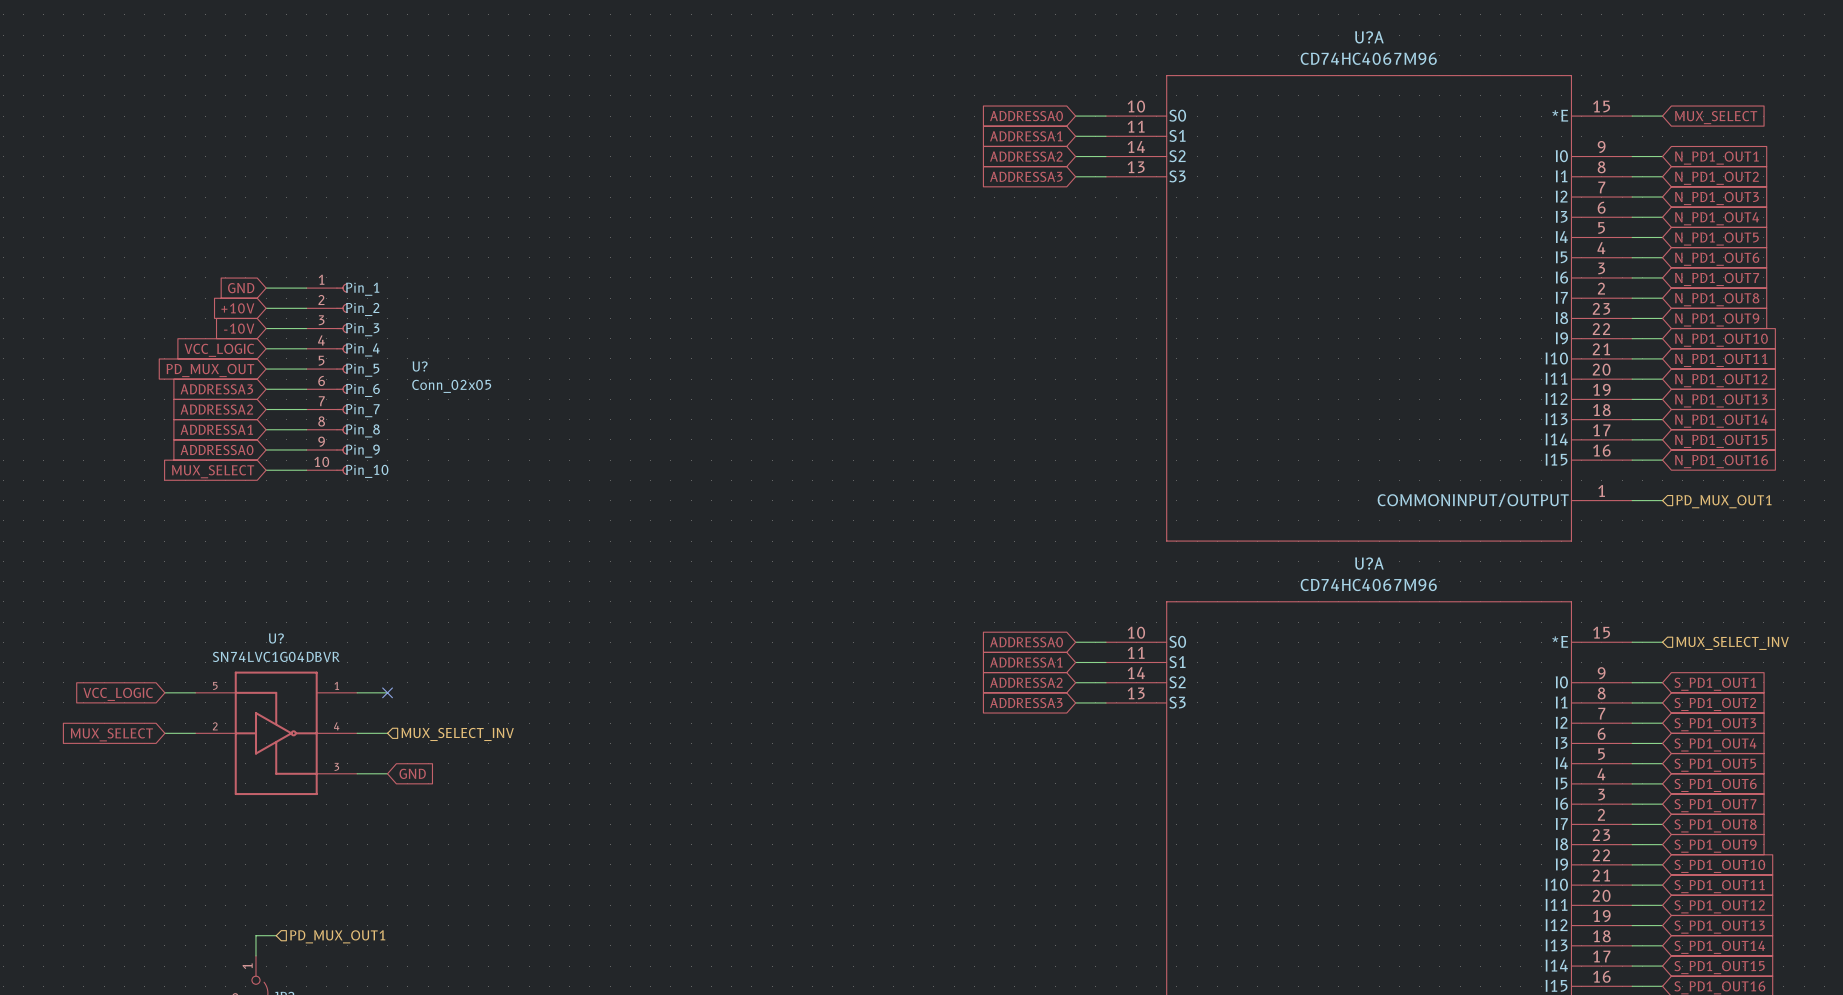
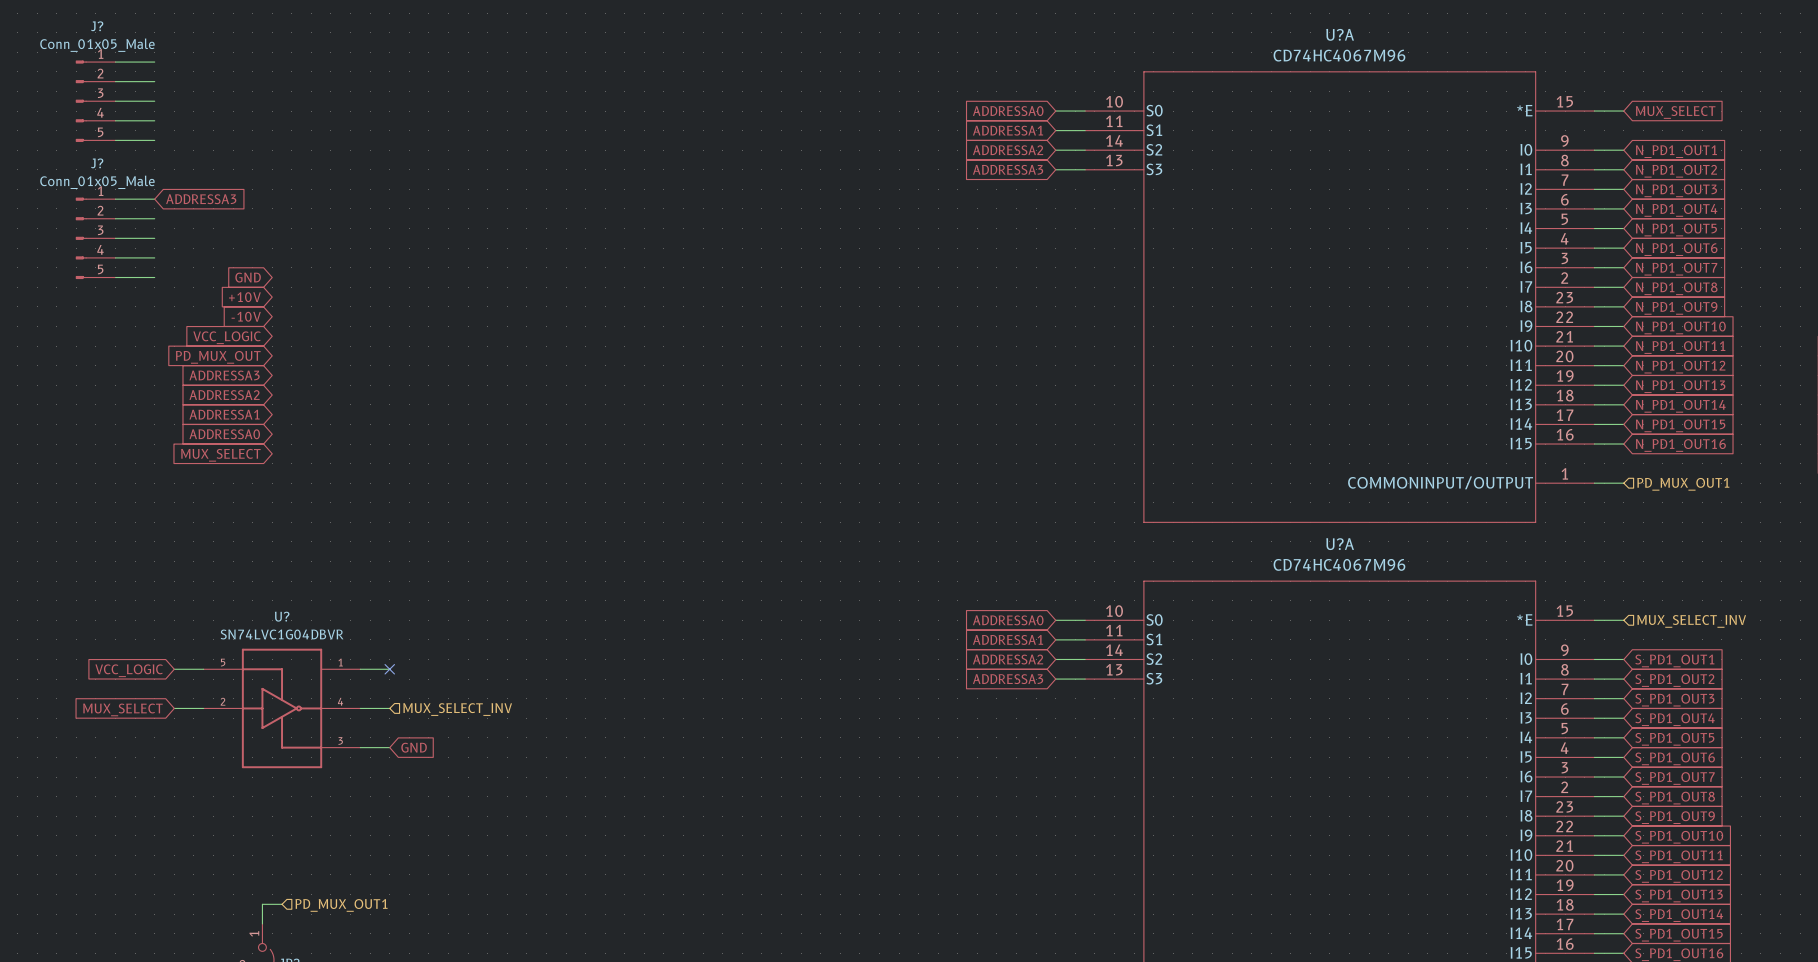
wire: none -> (115, 62) (154, 62)
wire: none -> (115, 81) (154, 81)
J?: none -> Conn_01x05_Male (95, 101)
wire: none -> (115, 101) (154, 101)
wire: none -> (115, 120) (154, 120)
wire: none -> (115, 140) (154, 140)
global label: none -> ADDRESSA3 (201, 199)
J?: none -> Conn_01x05_Male (95, 238)
wire: (266, 288) (306, 288) -> (115, 199) (154, 199)
wire: (266, 308) (306, 308) -> (115, 218) (154, 218)
wire: (266, 328) (306, 328) -> (115, 238) (154, 238)
wire: (266, 348) (306, 348) -> (115, 257) (154, 257)
wire: (266, 369) (306, 369) -> (115, 277) (154, 277)
U?: Conn_02x05 (327, 379) -> none
wire: (266, 389) (306, 389) -> none
wire: (266, 409) (306, 409) -> none
wire: (266, 429) (306, 429) -> none
wire: (266, 449) (306, 449) -> none
wire: (266, 470) (306, 470) -> none

